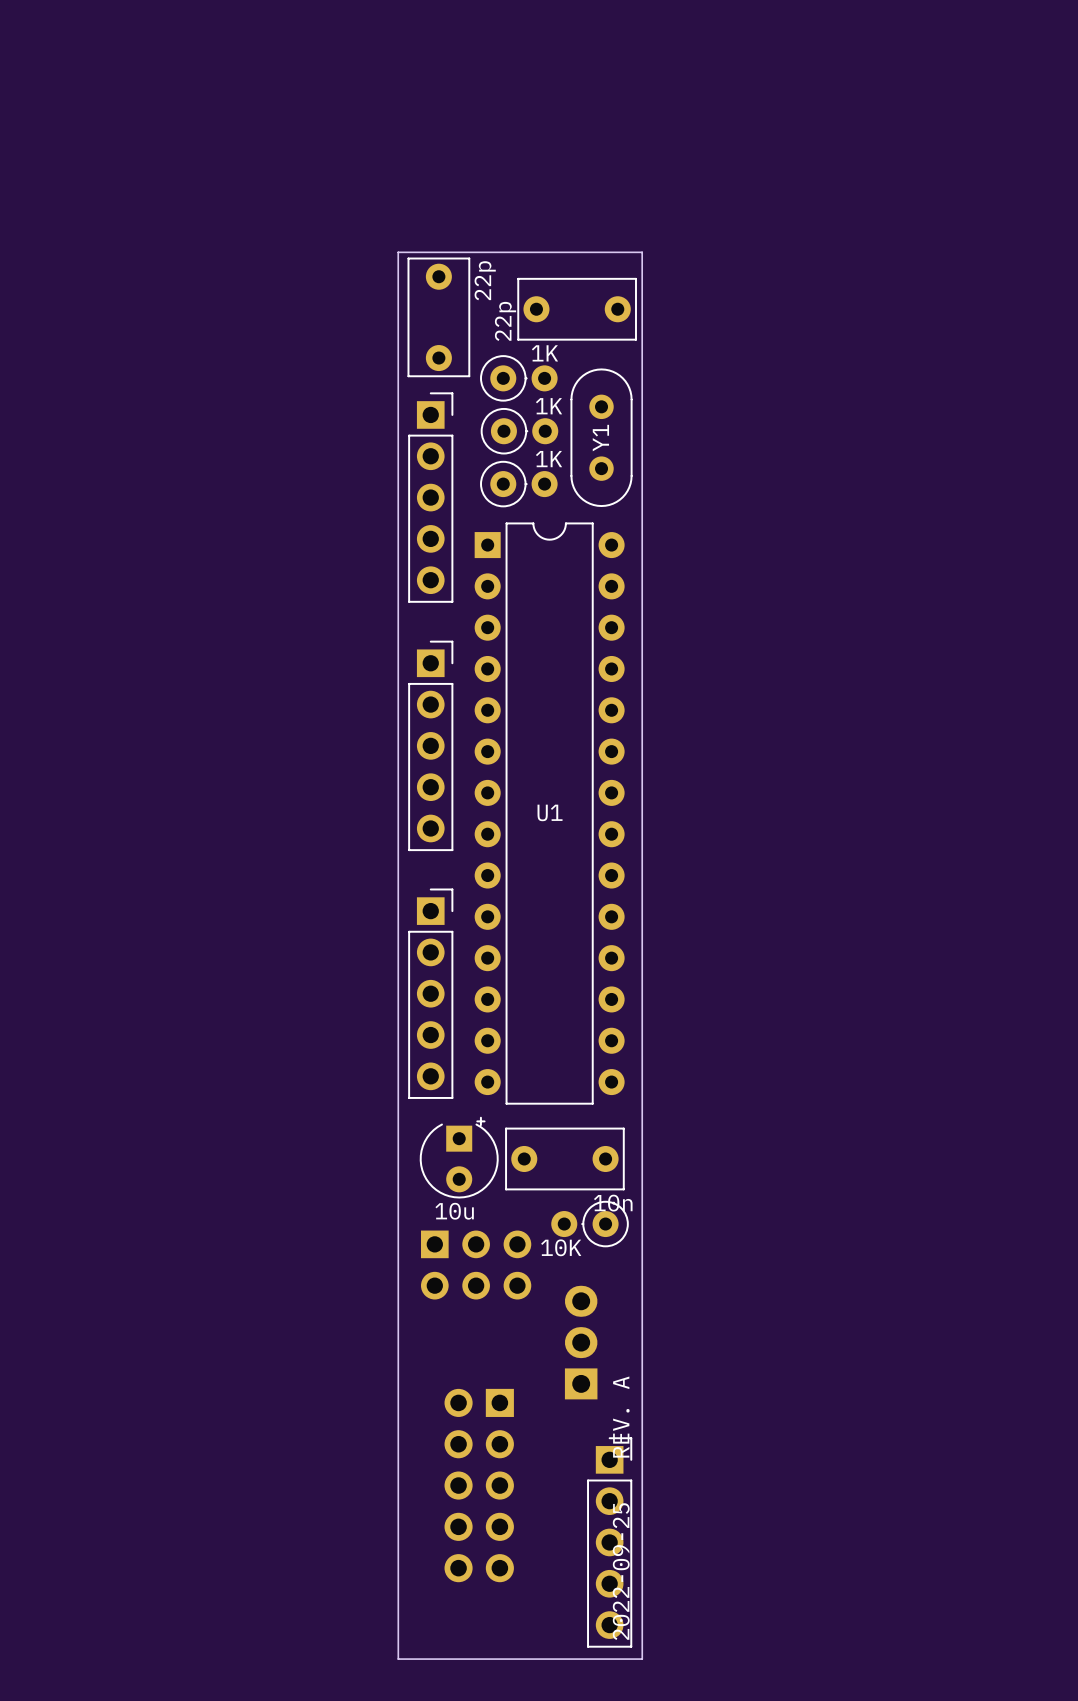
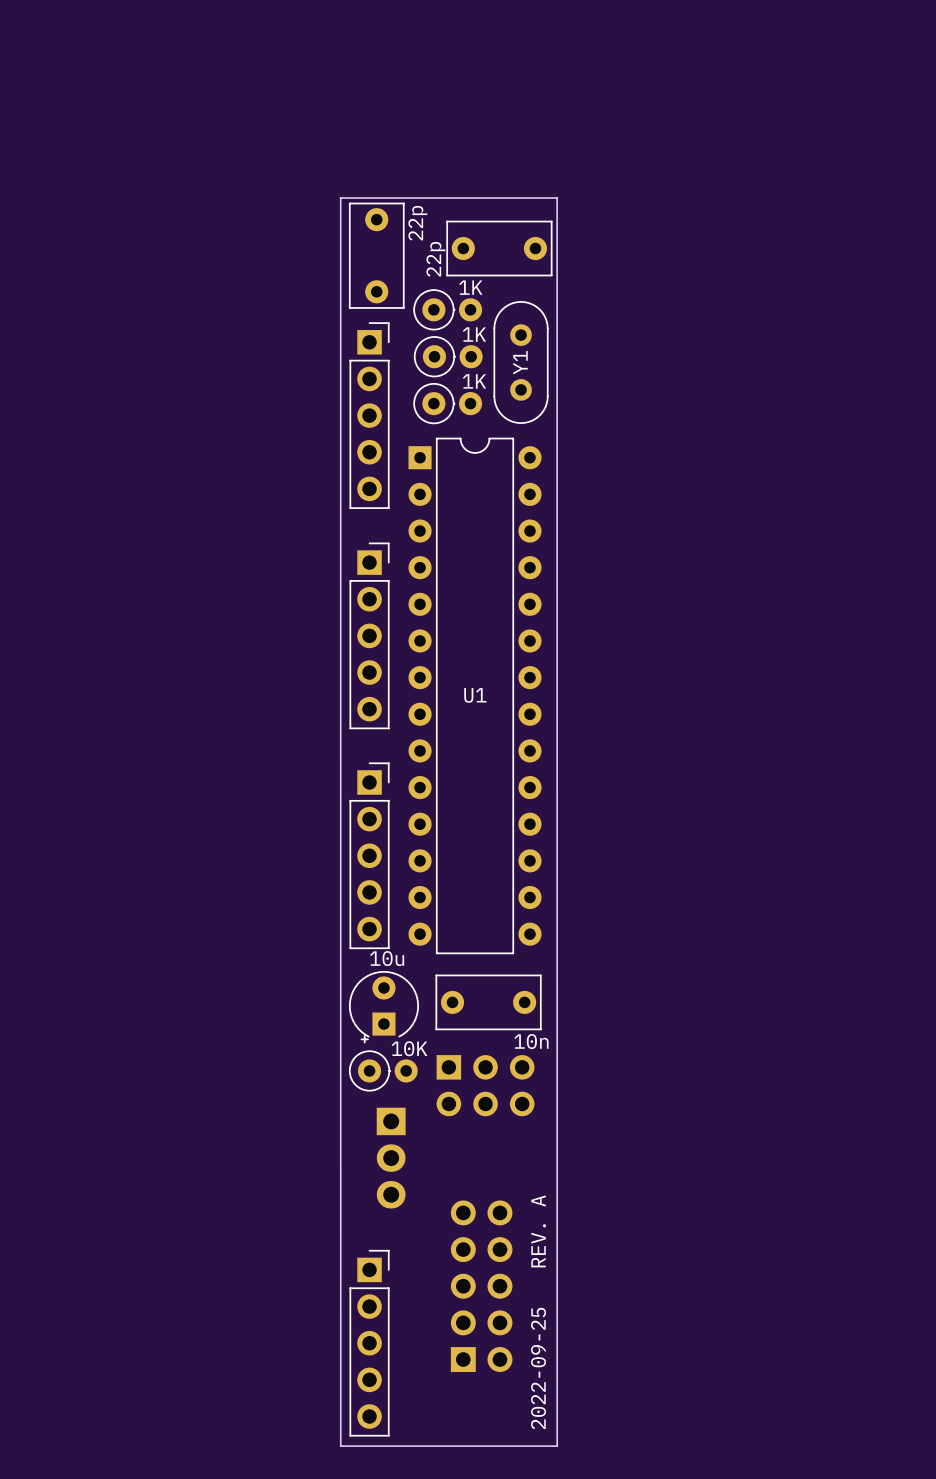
part rotation: 0° (459, 1157) -> 180° (383, 1007)
part rotation: 0° (590, 1224) -> 180° (383, 1070)
part position: (590, 1224) -> (383, 1070)
part position: (476, 1265) -> (485, 1085)
part rotation: 0° (581, 1342) -> 180° (391, 1158)
part position: (581, 1342) -> (391, 1158)
part rotation: 0° (479, 1485) -> 180° (481, 1286)
part position: (609, 1542) -> (369, 1343)

